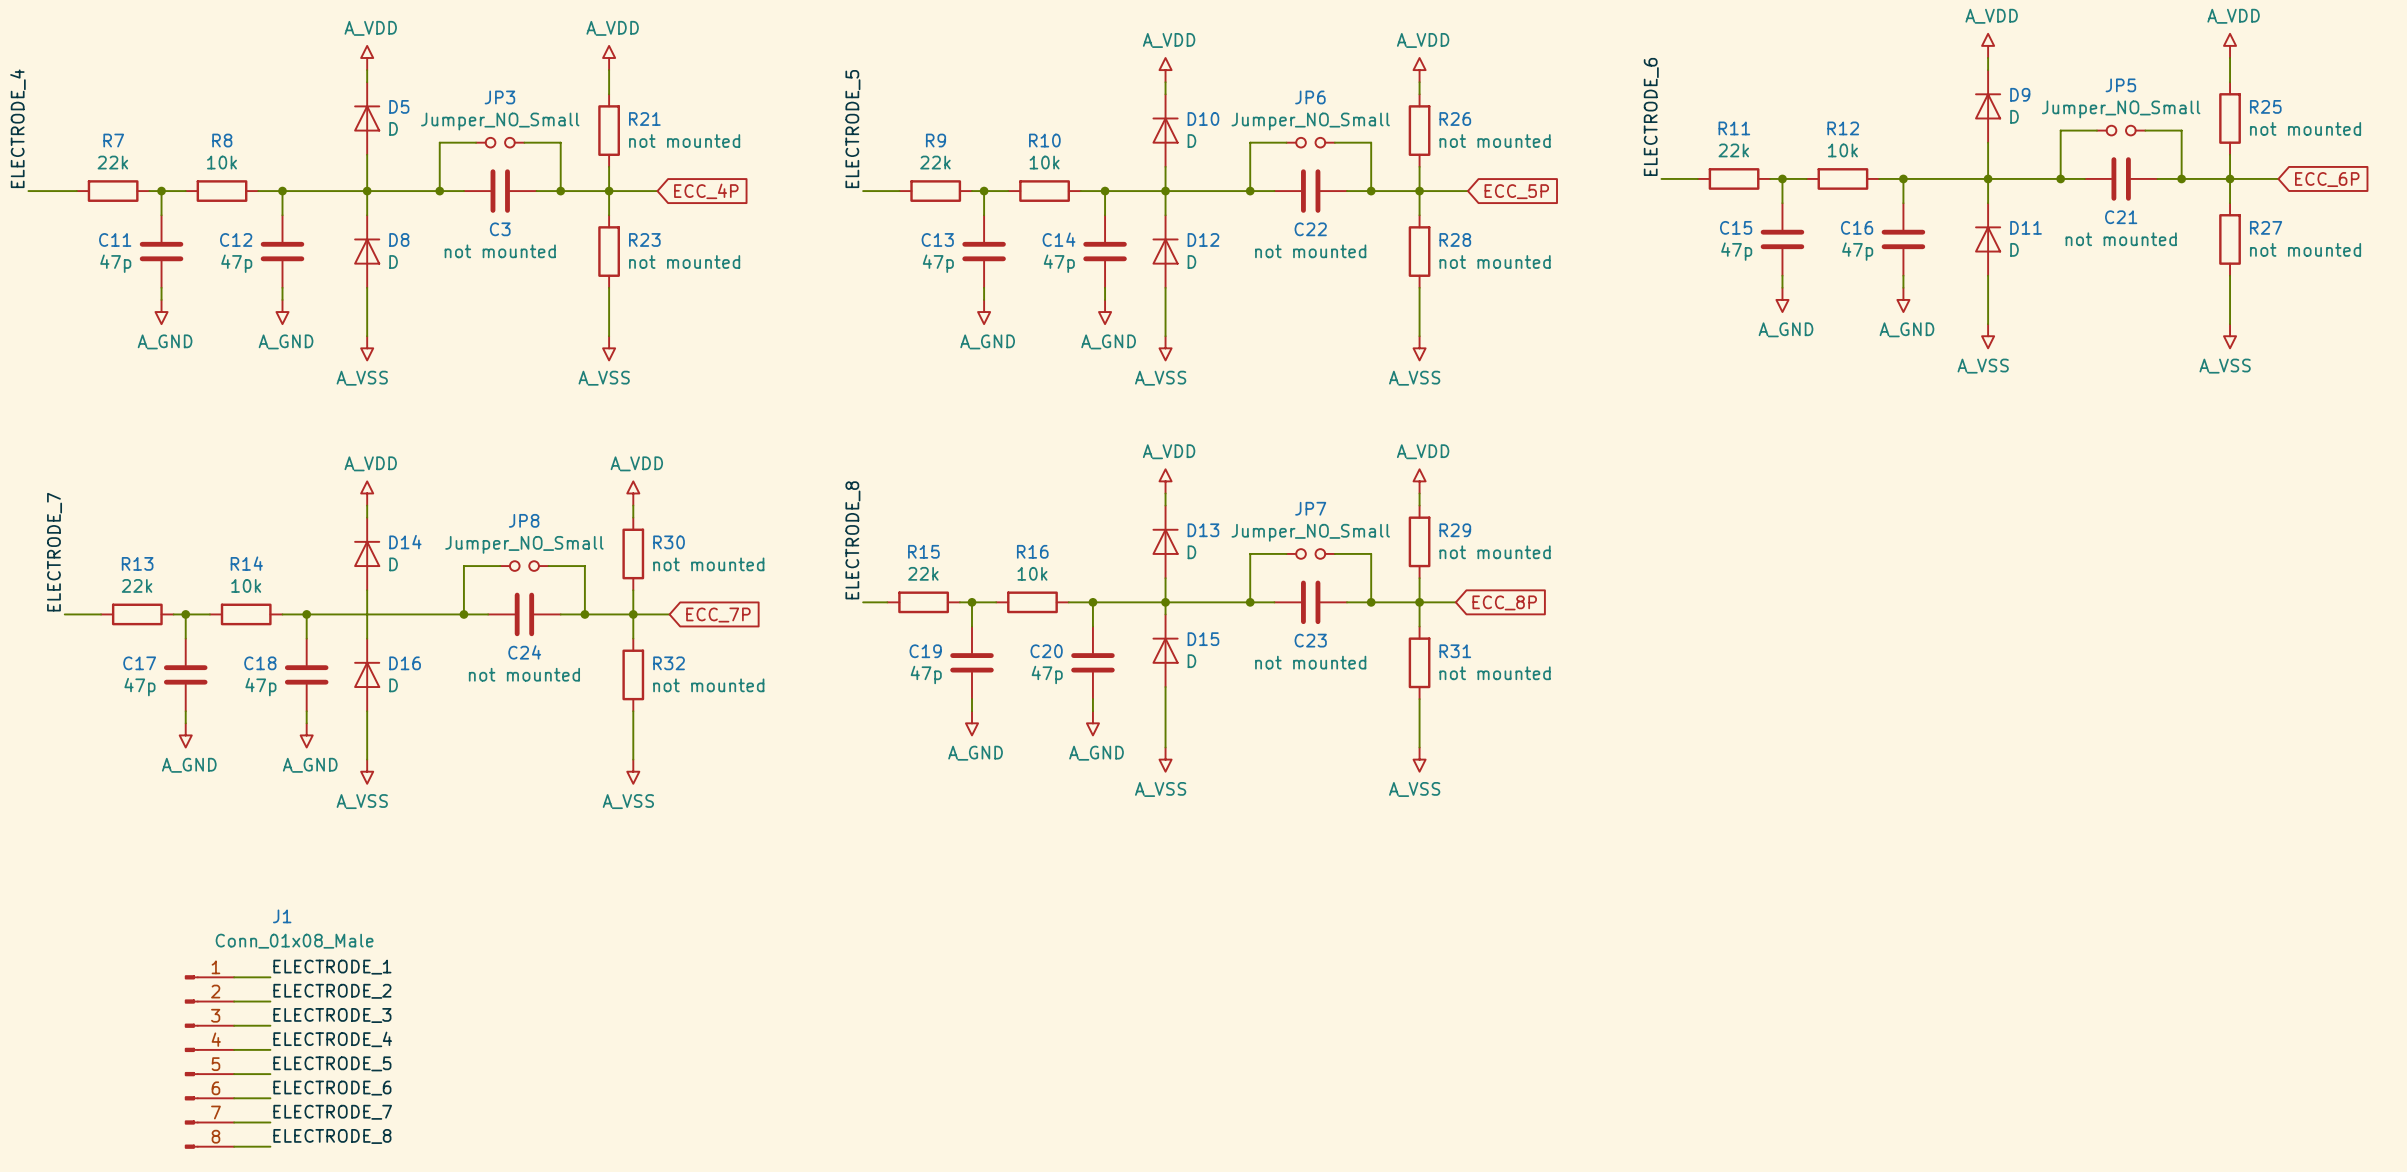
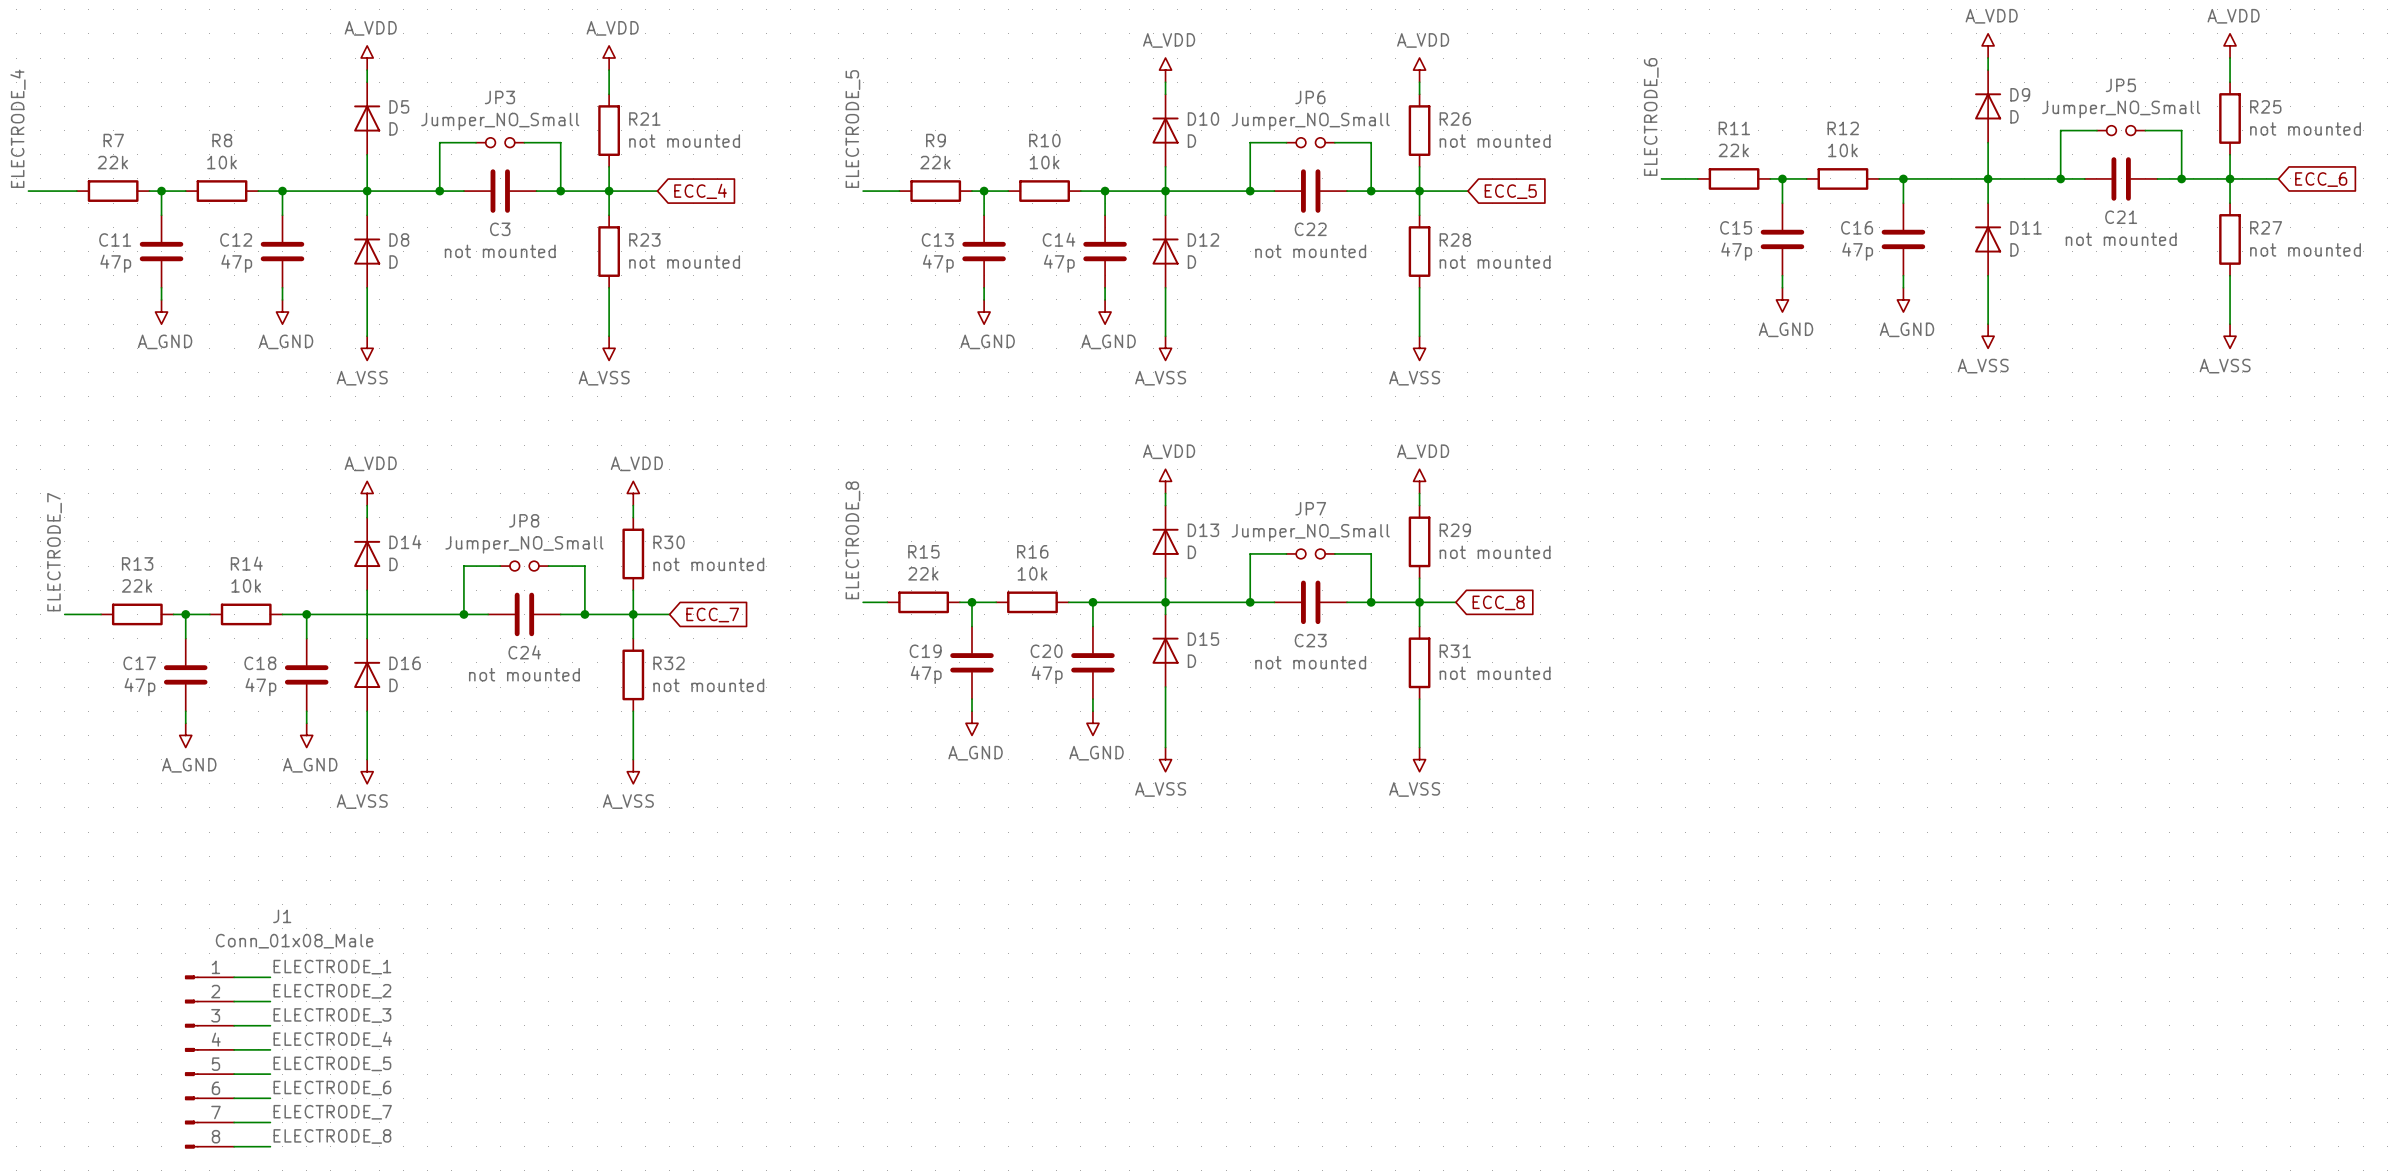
global label: ECC_6P (2327, 179) -> ECC_6 (2321, 179)
global label: ECC_4P (706, 191) -> ECC_4 (700, 191)
global label: ECC_5P (1516, 191) -> ECC_5 (1510, 191)
global label: ECC_8P (1504, 602) -> ECC_8 (1498, 602)
global label: ECC_7P (718, 615) -> ECC_7 (712, 615)

